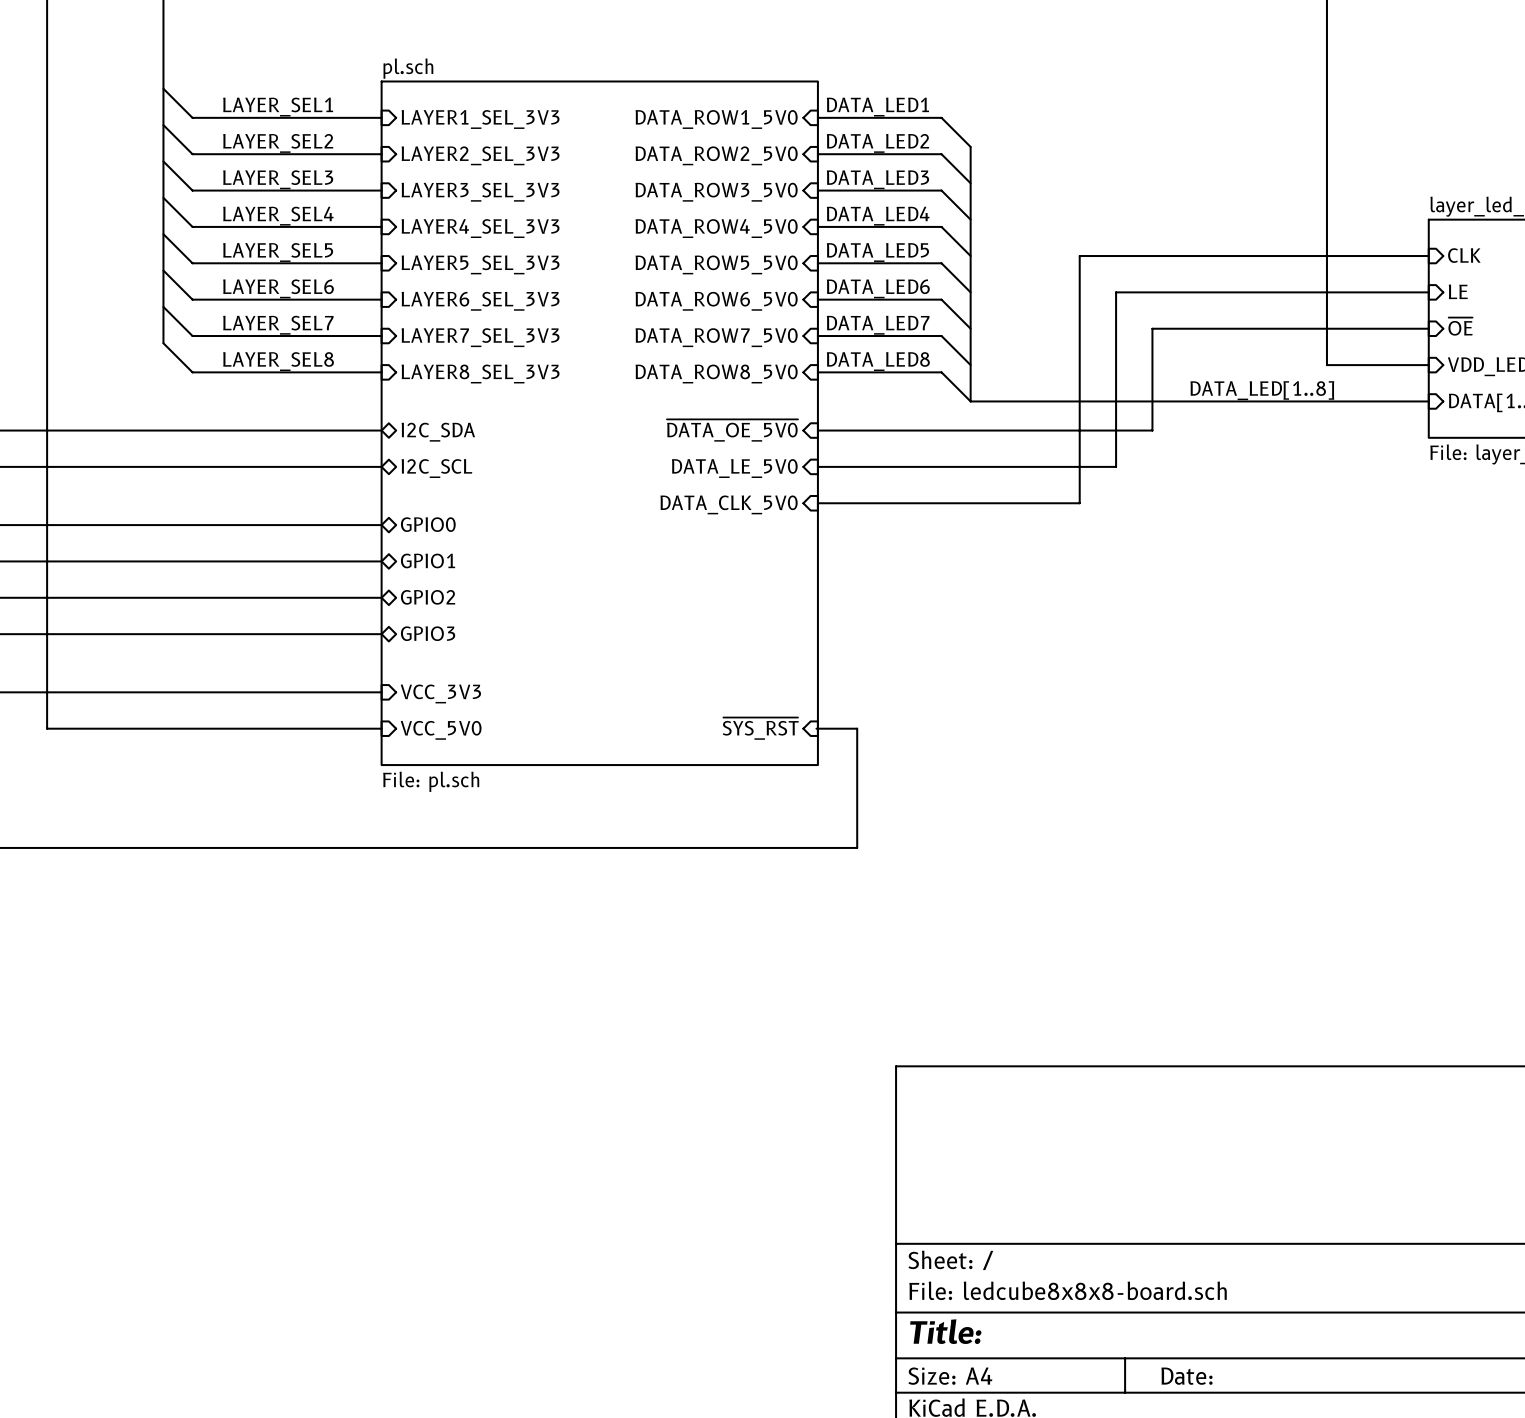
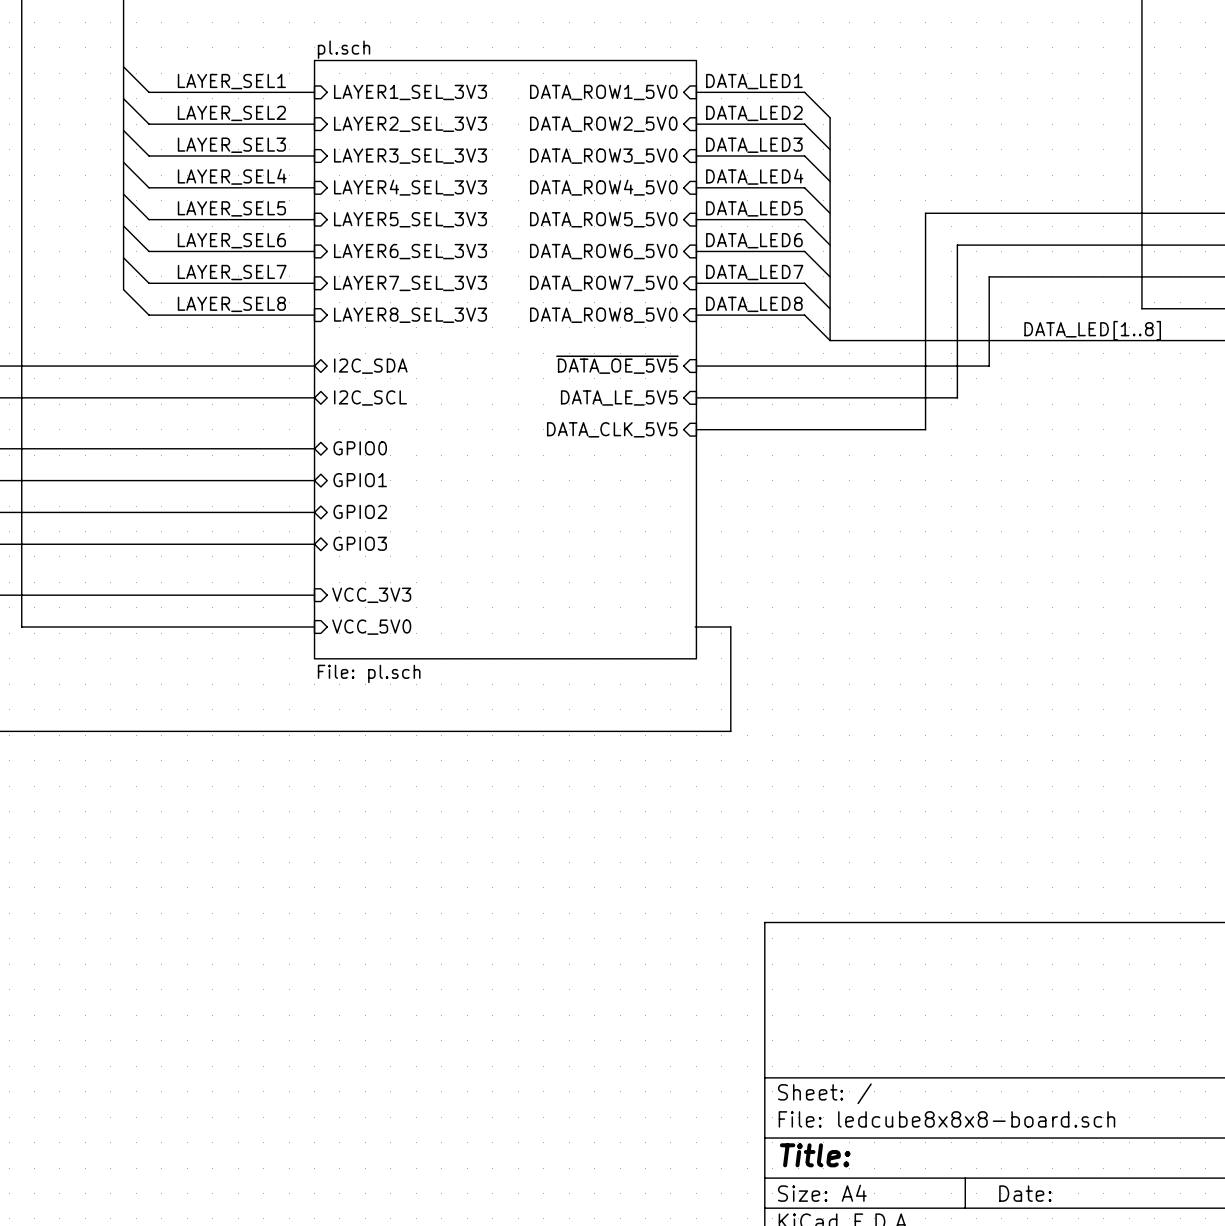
sheet pin: ~{DATA_OE_5V0} (732, 430) -> ~{DATA_OE_5V5} (617, 364)
sheet pin: DATA_LE_5V0 (734, 468) -> DATA_LE_5V5 (619, 397)
sheet pin: DATA_CLK_5V0 (729, 504) -> DATA_CLK_5V5 (612, 429)
sheet pin: ~{SYS_RST} (760, 728) -> none

